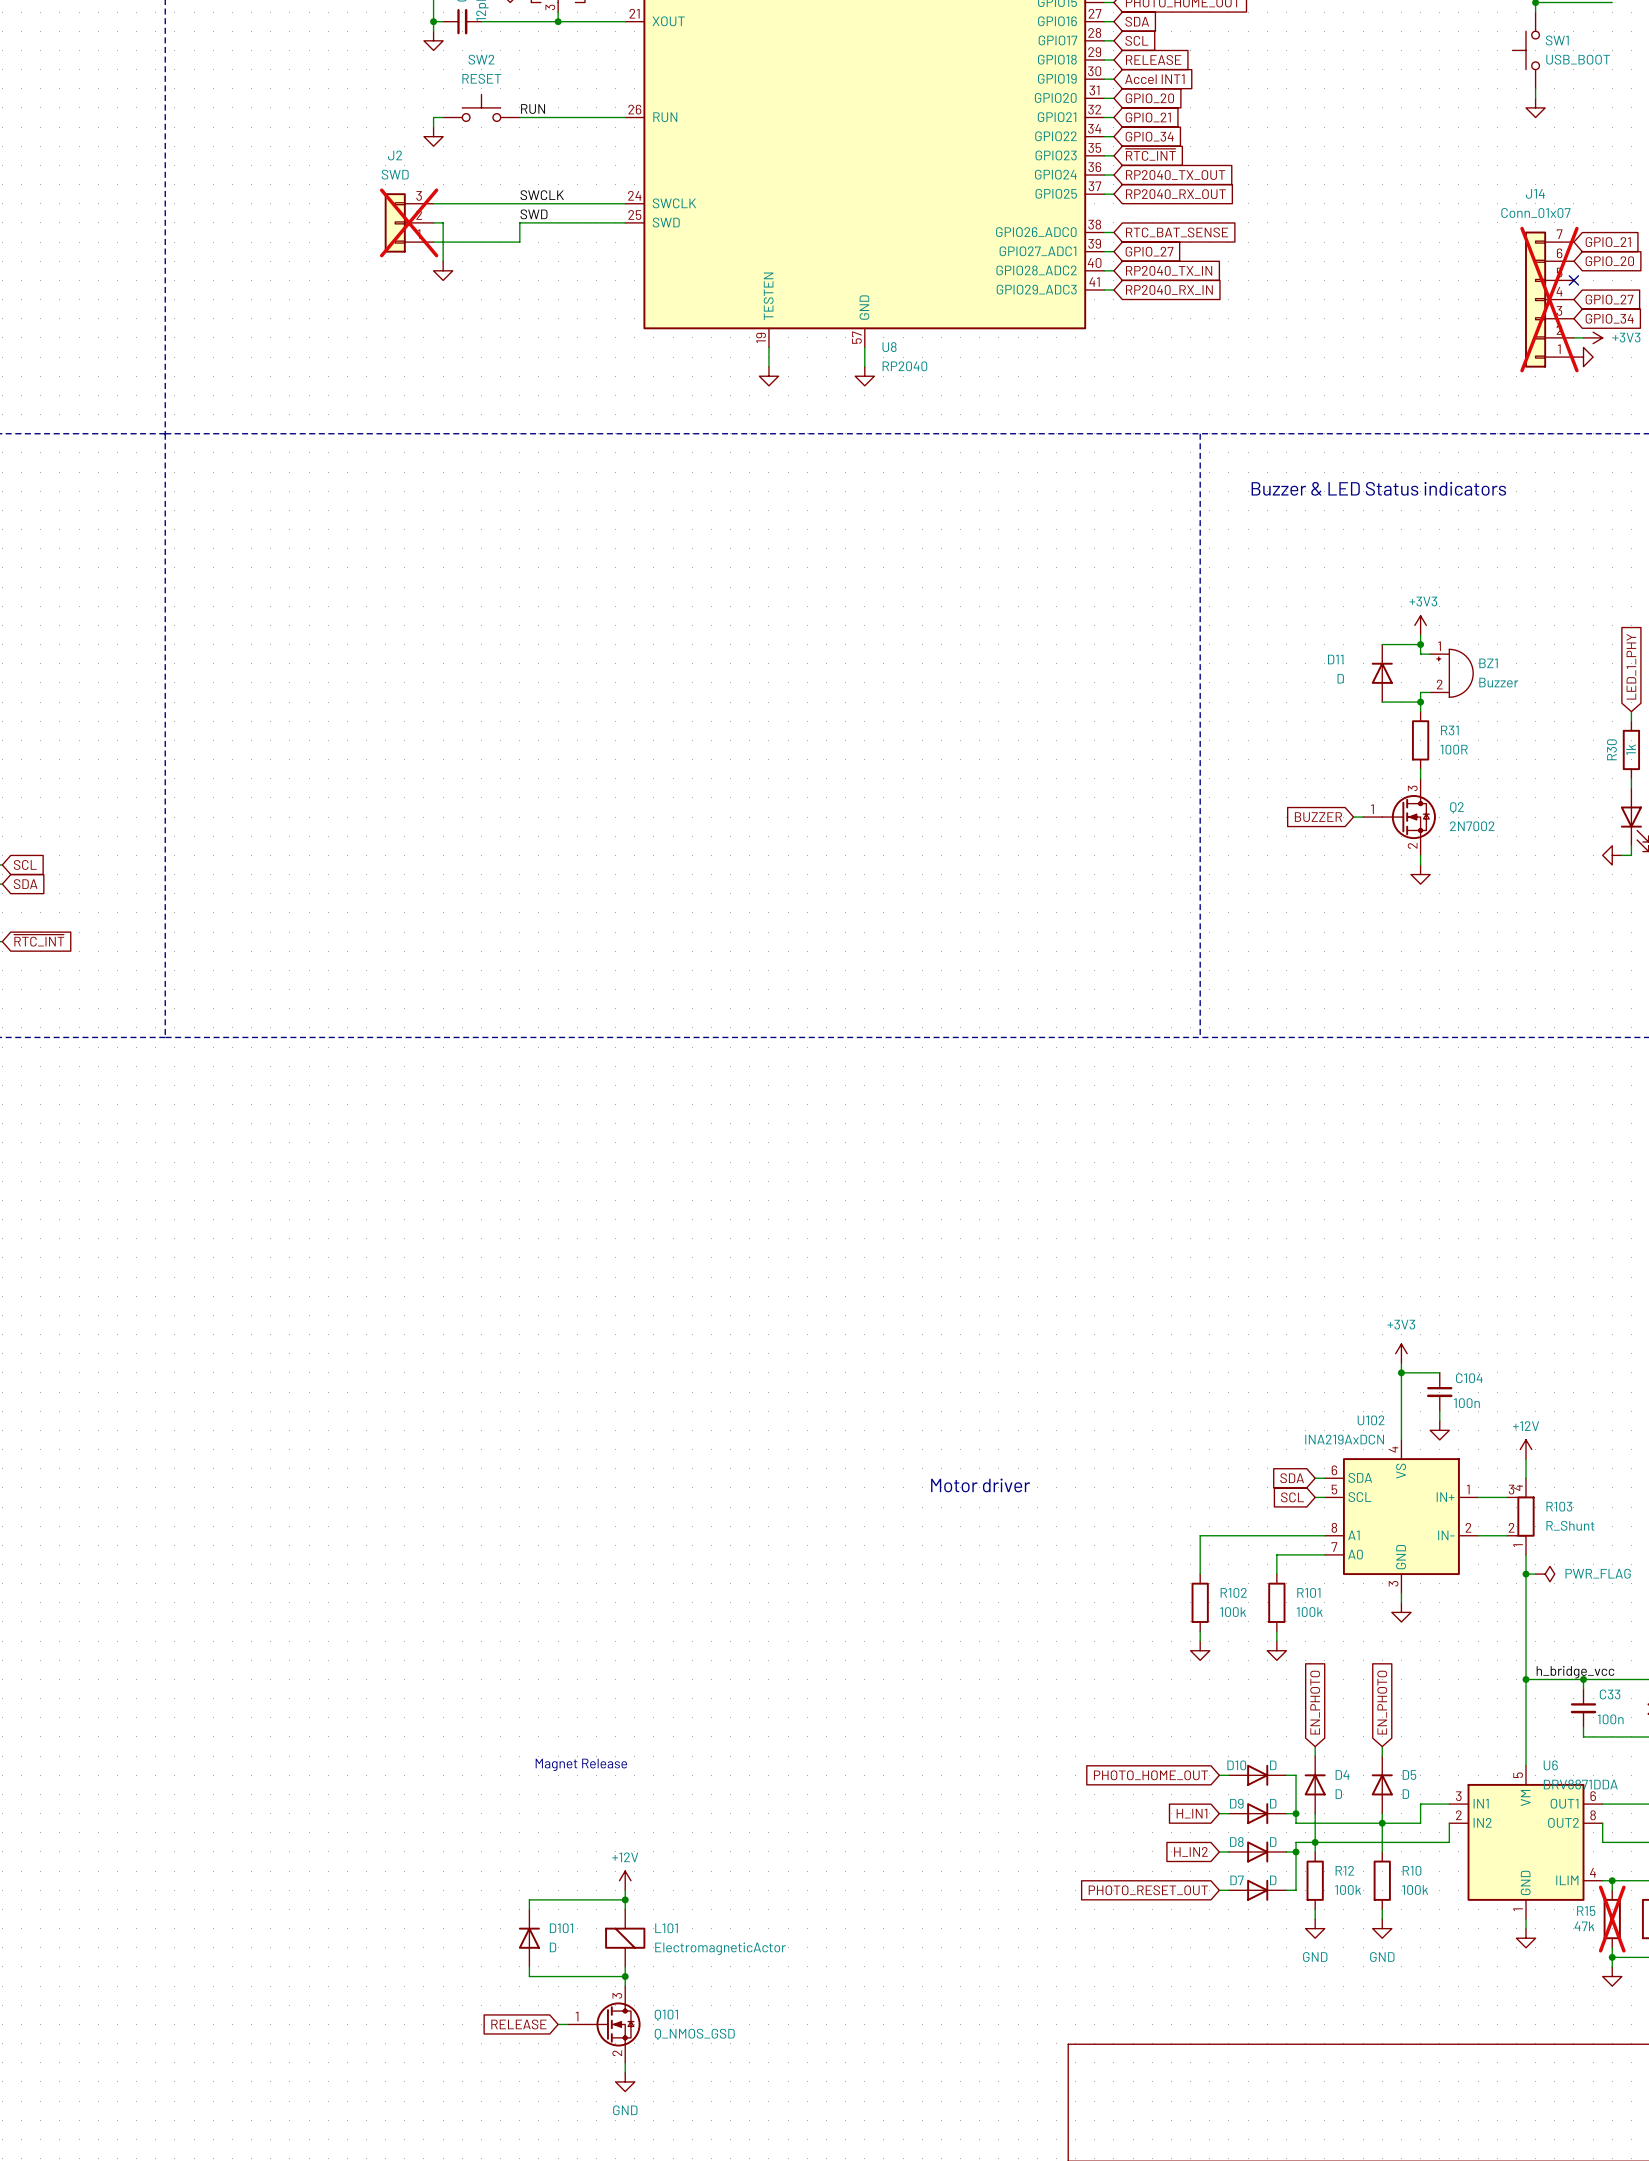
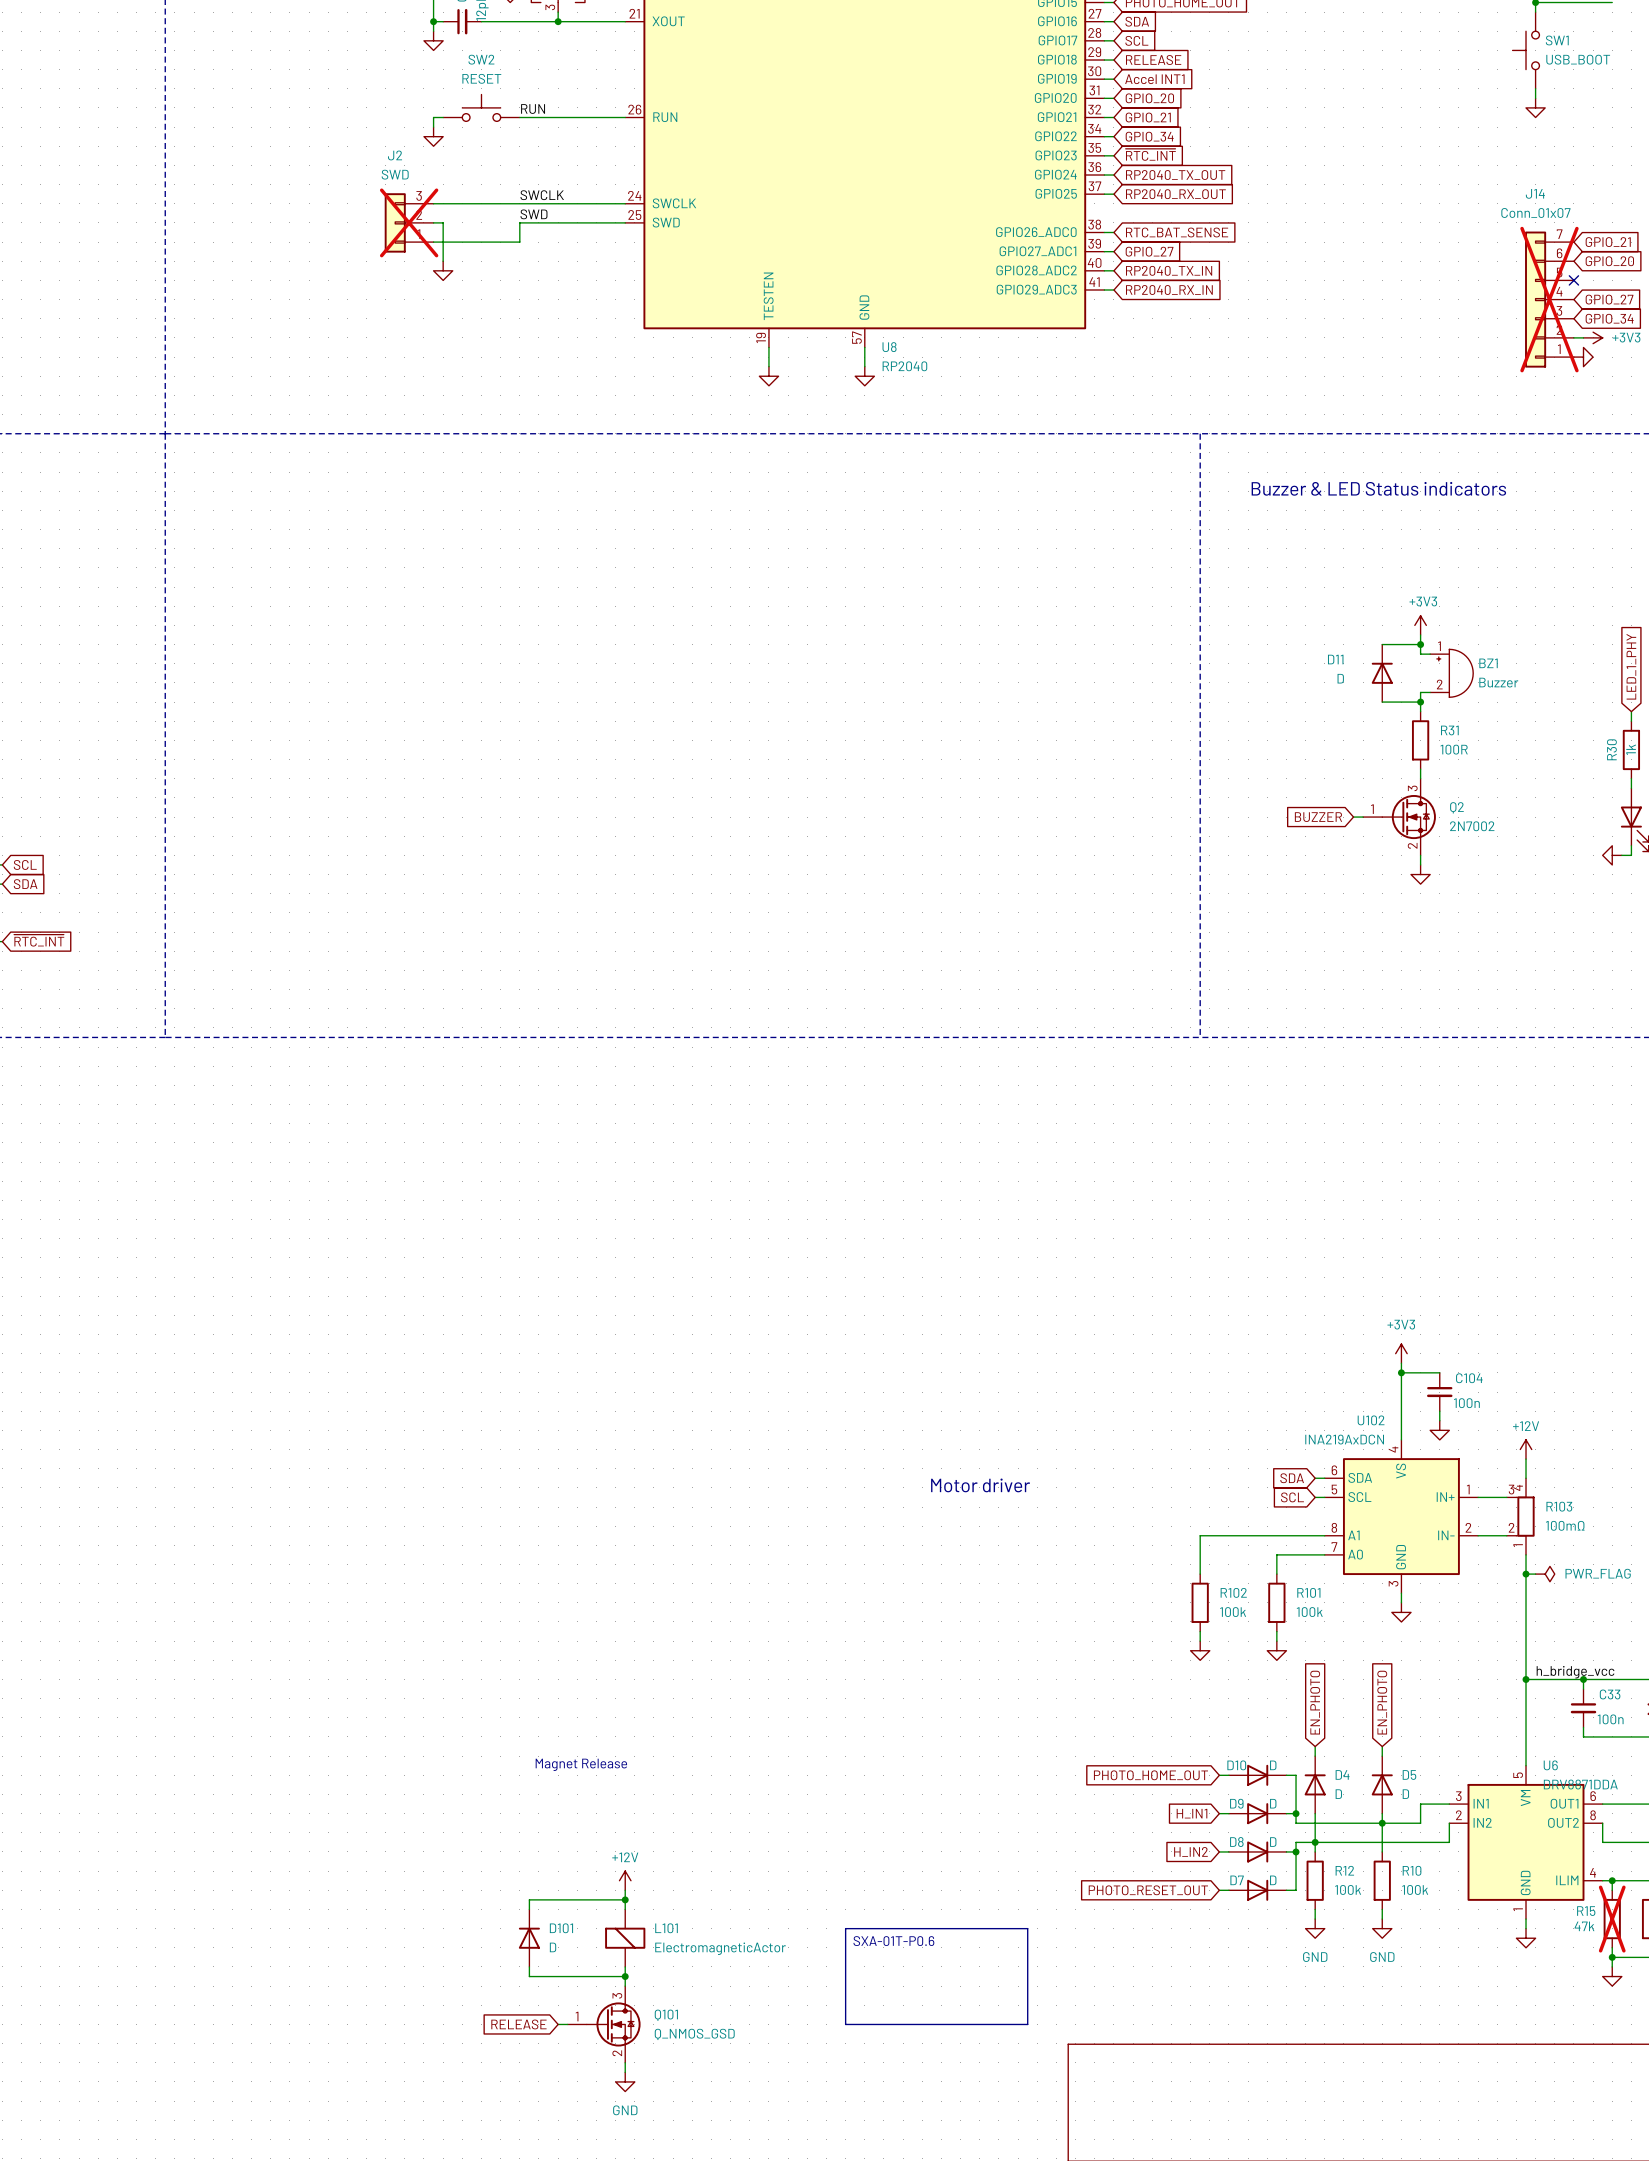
R103 value: R_Shunt (1570, 1525) -> 100mΩ (1565, 1525)
line: none -> (845, 1928) (1027, 1928) (1027, 2024) (845, 2024) (845, 1928)
text: none -> SXA-01T-P0.6 (893, 1941)

